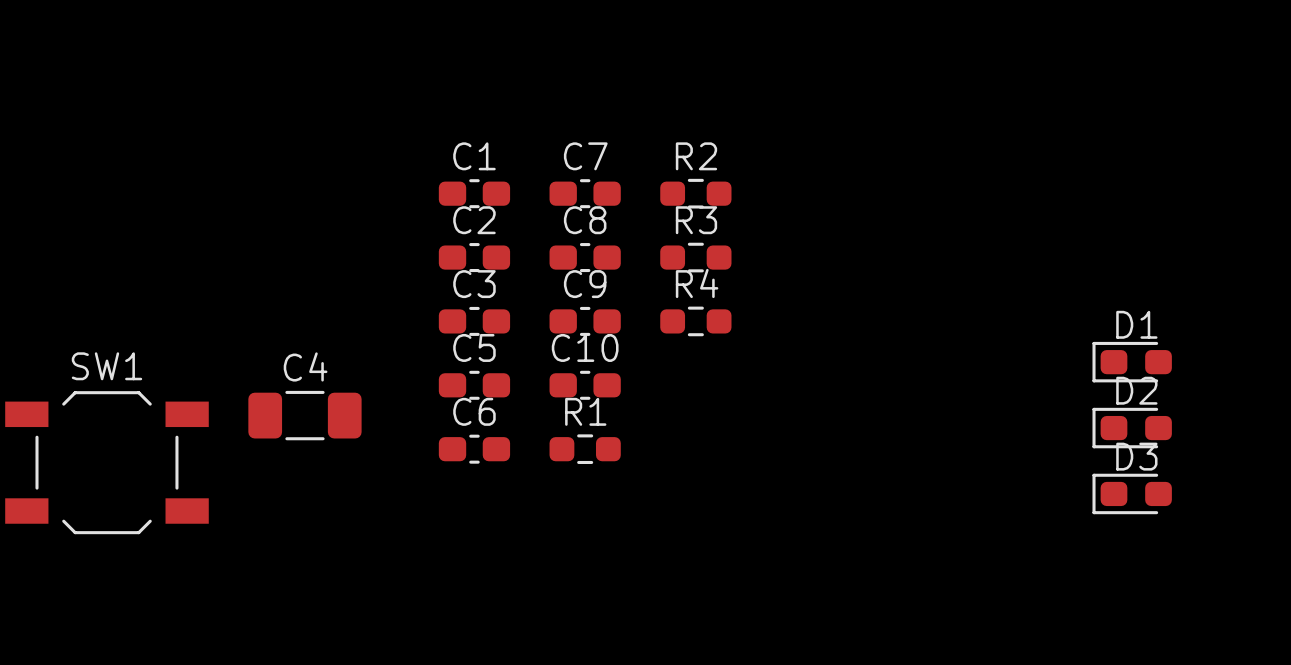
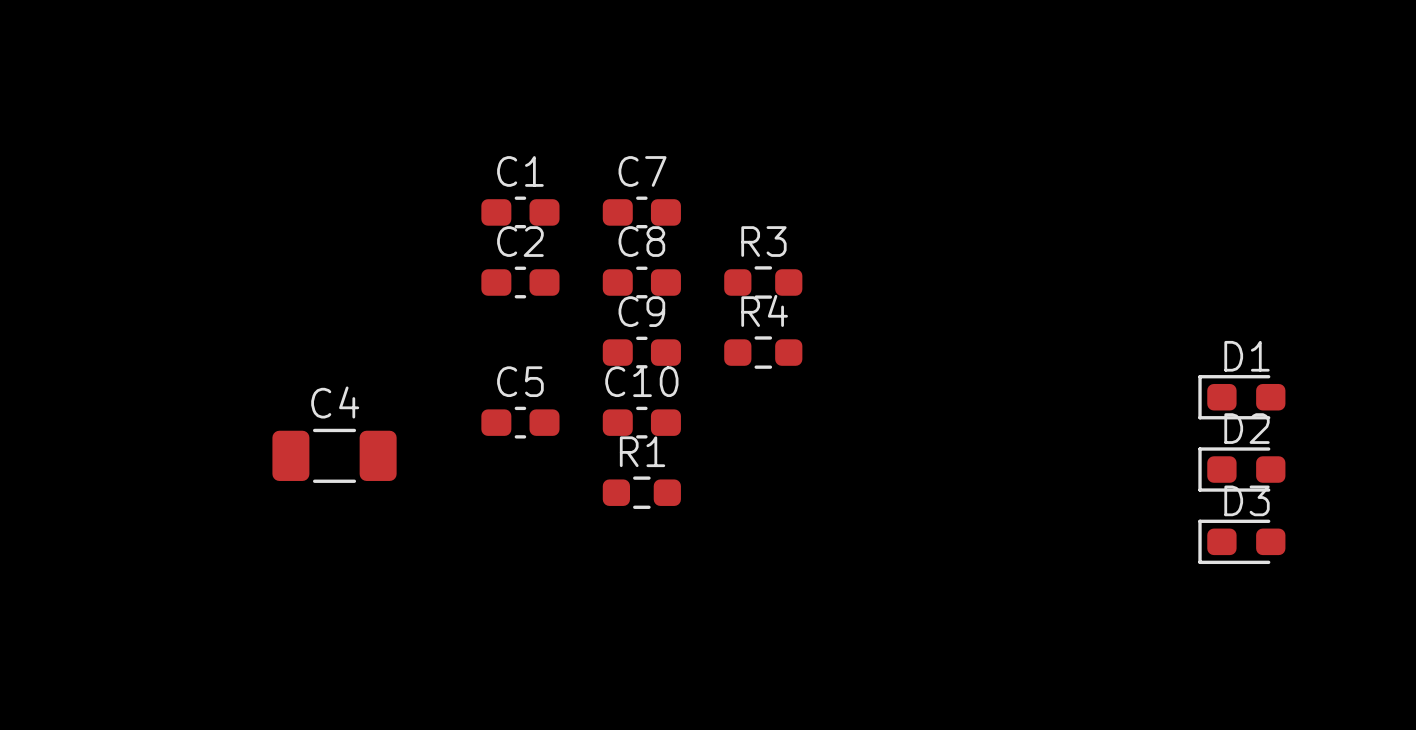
R2: (695, 193) -> none
C3: (474, 321) -> none
C6: (474, 449) -> none
SW1: (106, 462) -> none

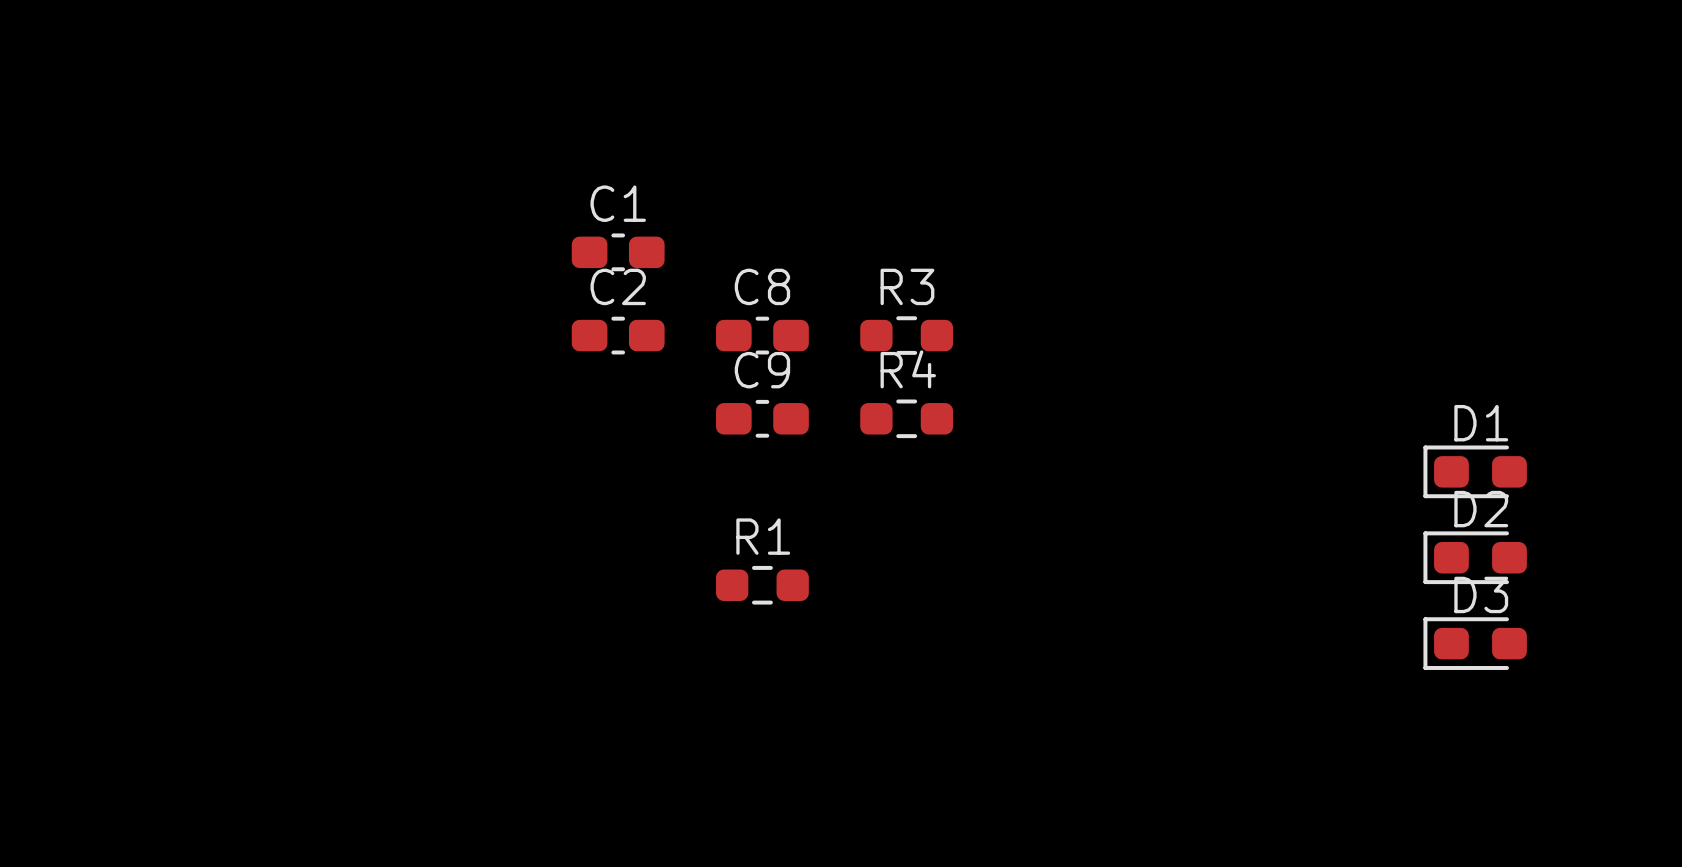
C7: (641, 212) -> none
C5: (520, 422) -> none
C10: (641, 422) -> none
C4: (334, 455) -> none

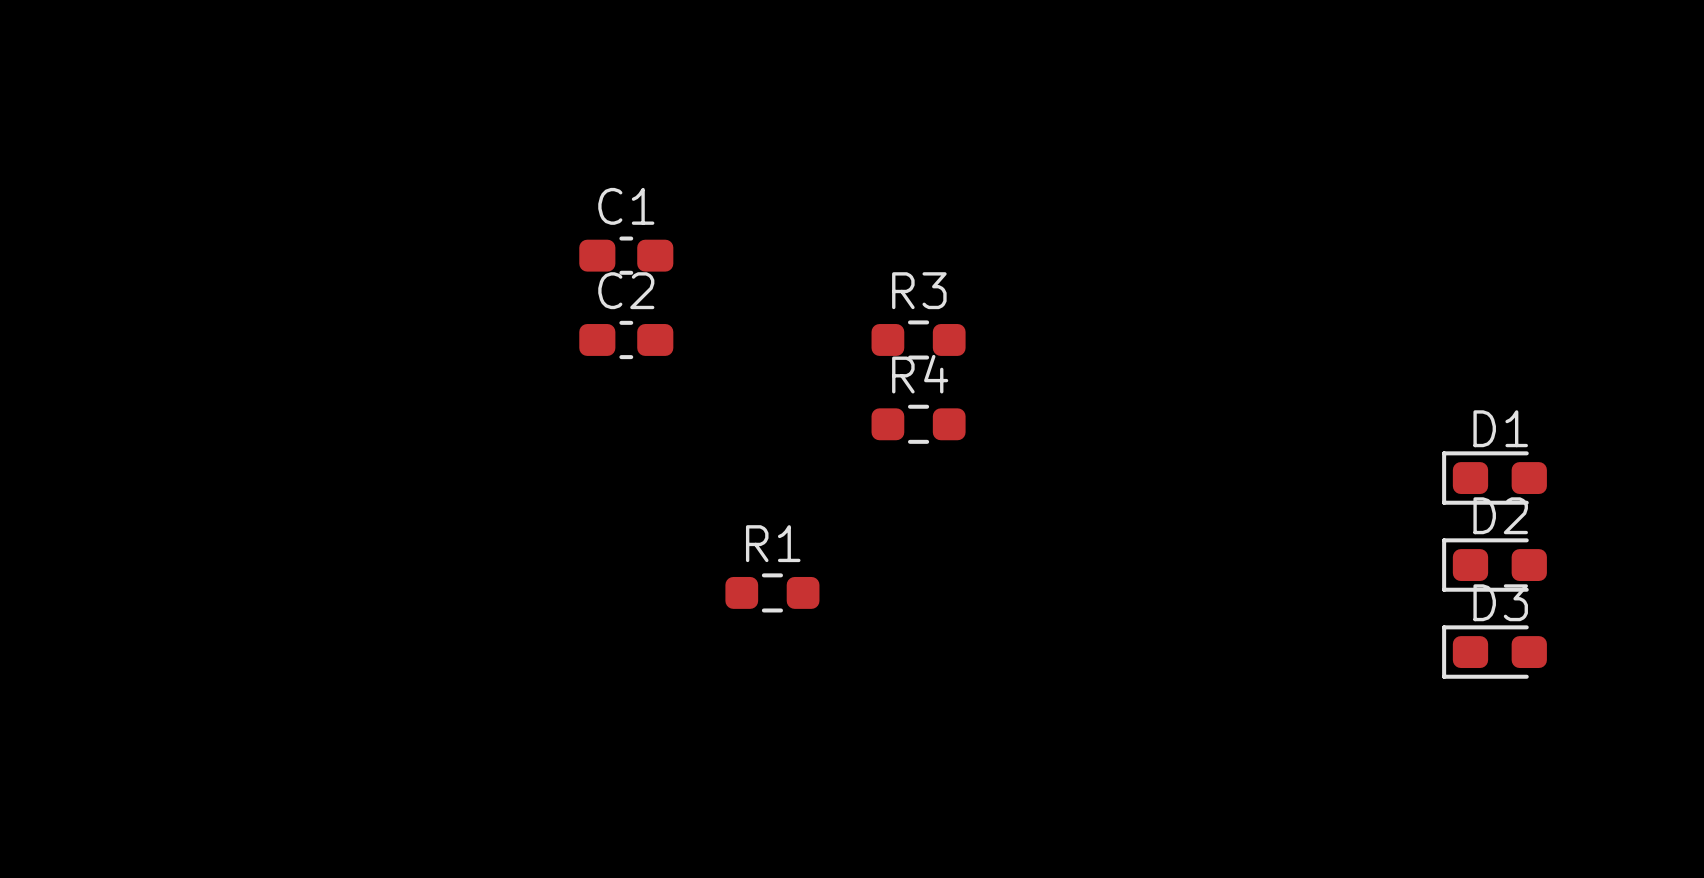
C8: (762, 335) -> none
C9: (762, 418) -> none

